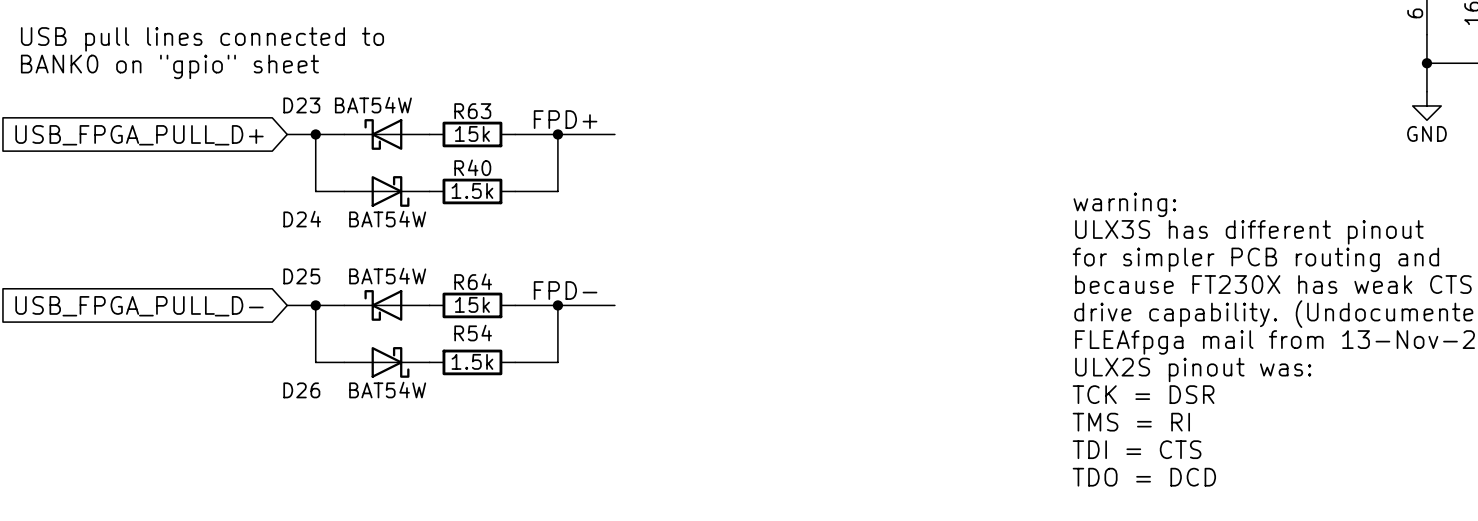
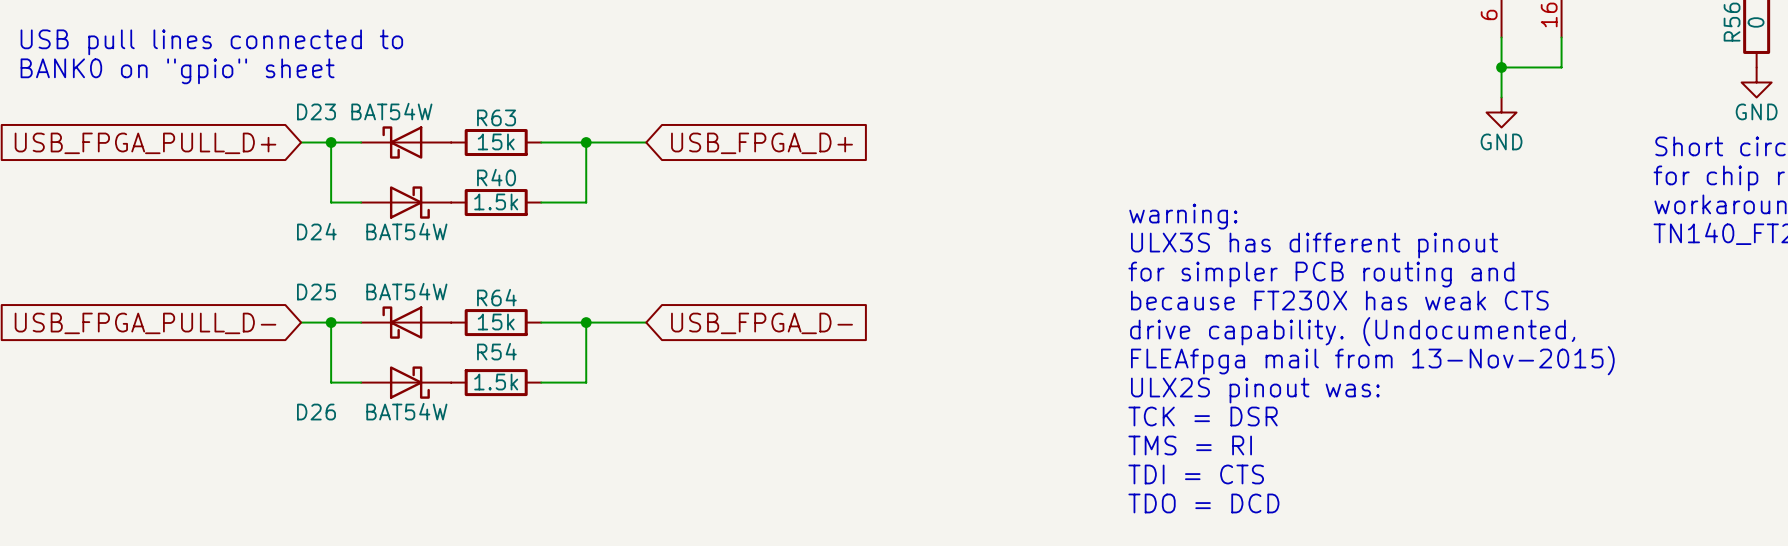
label: FPD+ (565, 119) -> none
global label: none -> USB_FPGA_D+ (762, 143)
label: FPD- (565, 290) -> none
global label: none -> USB_FPGA_D- (762, 323)

